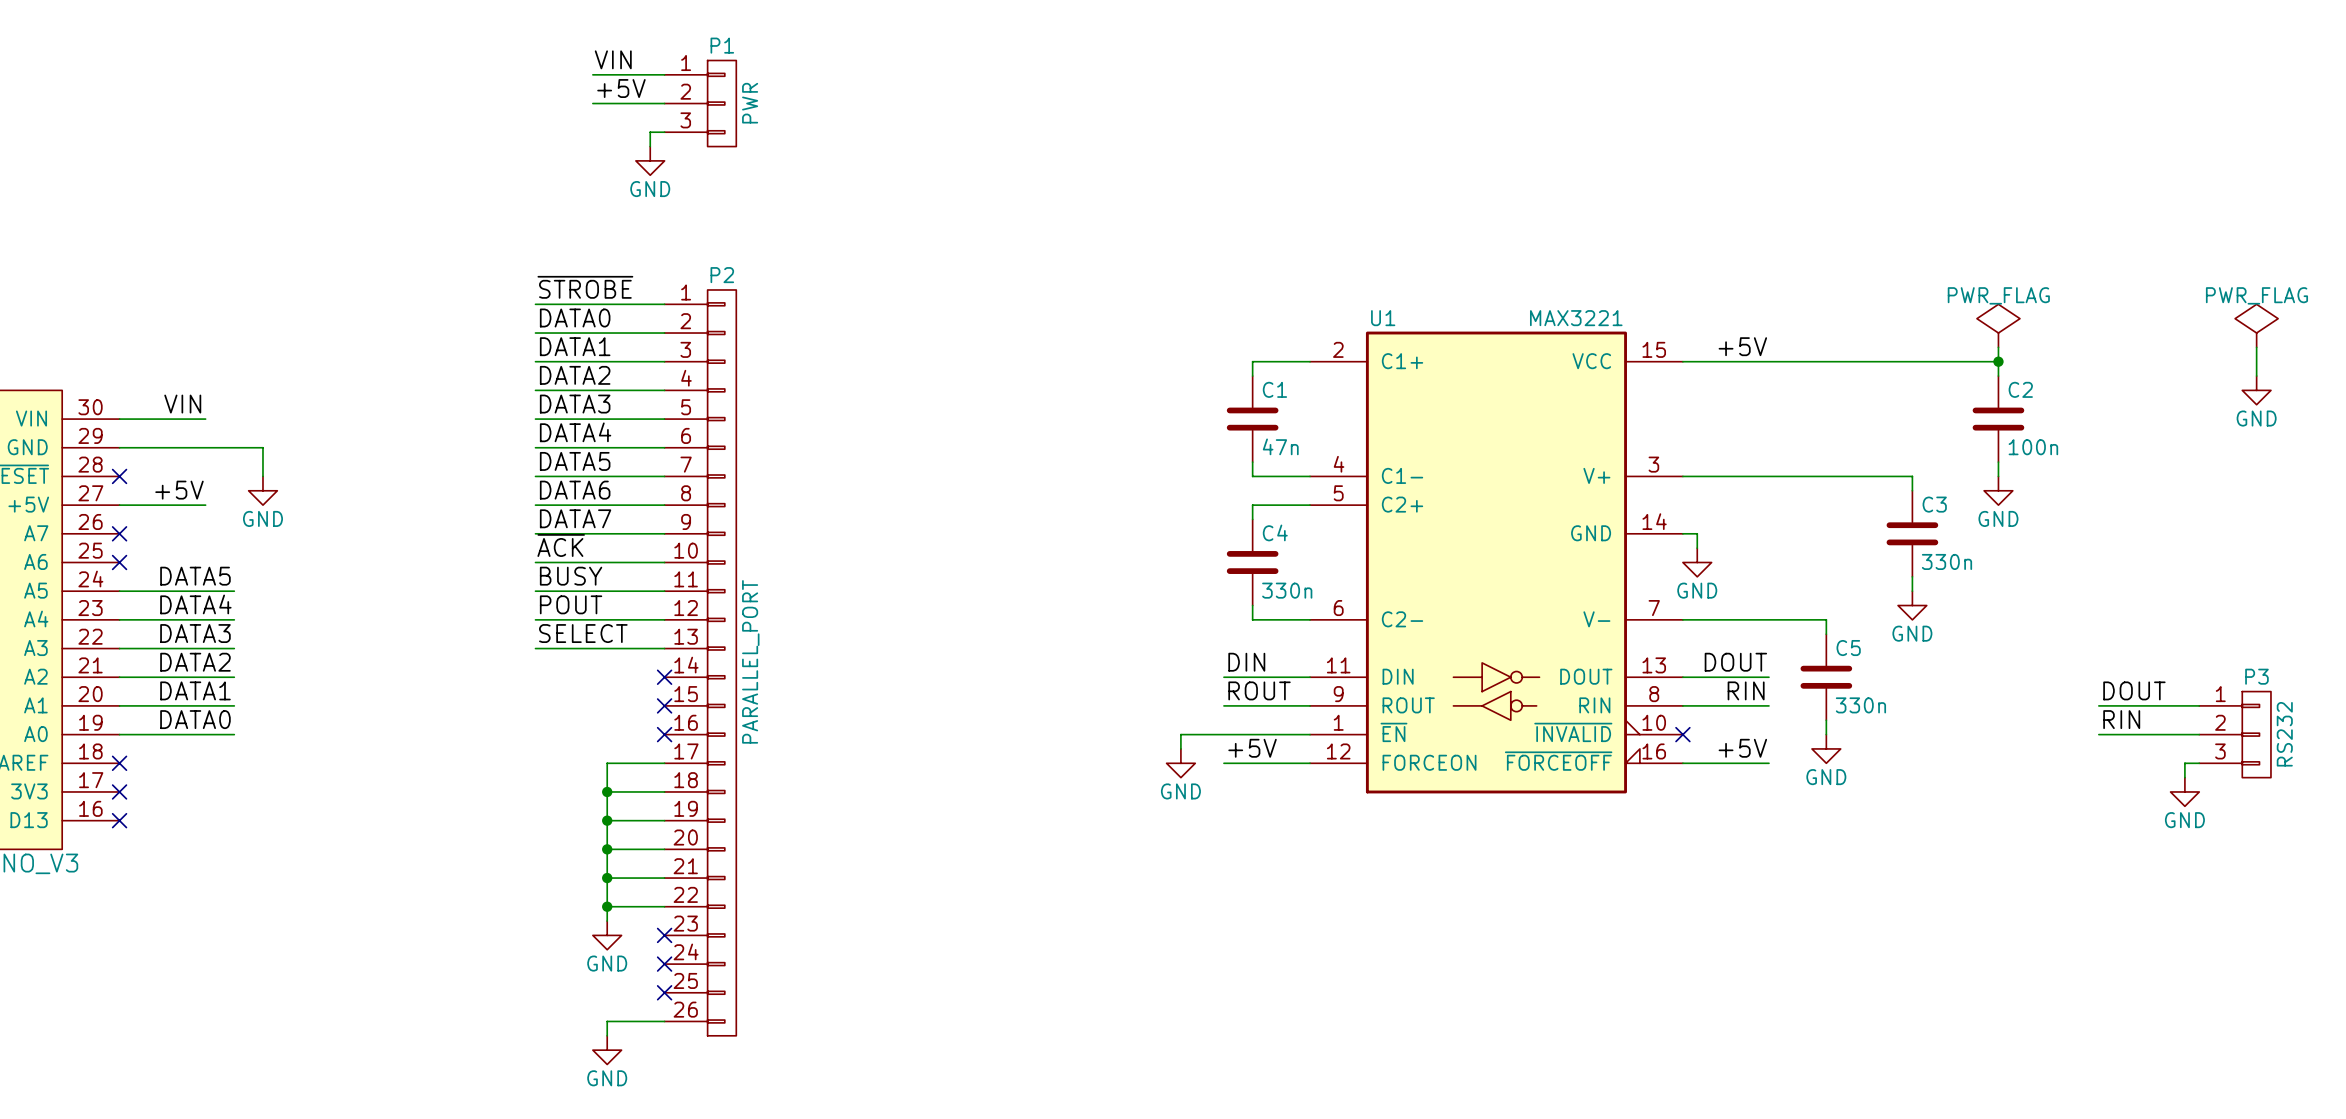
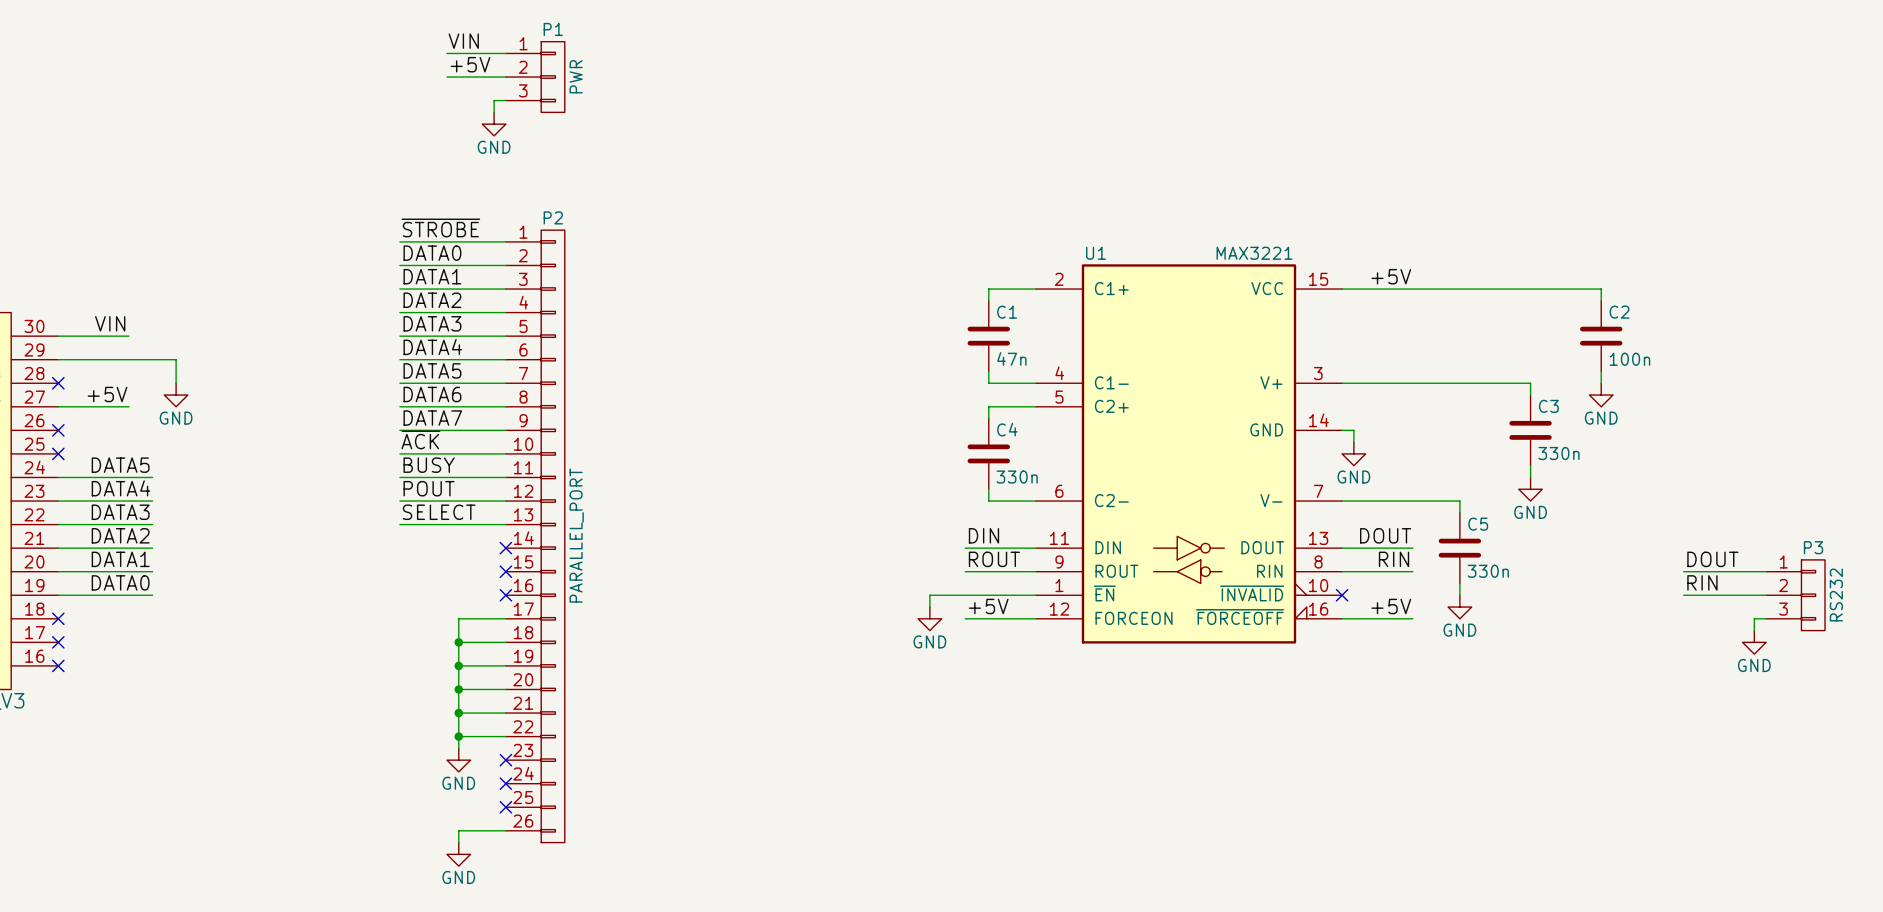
power symbol: PWR_FLAG (1998, 325) -> none
power symbol: PWR_FLAG (2256, 325) -> none
wire: (1998, 347) (1998, 361) -> none
wire: (2256, 347) (2256, 376) -> none
junction: (1998, 361) -> none
power symbol: GND (2256, 390) -> none

